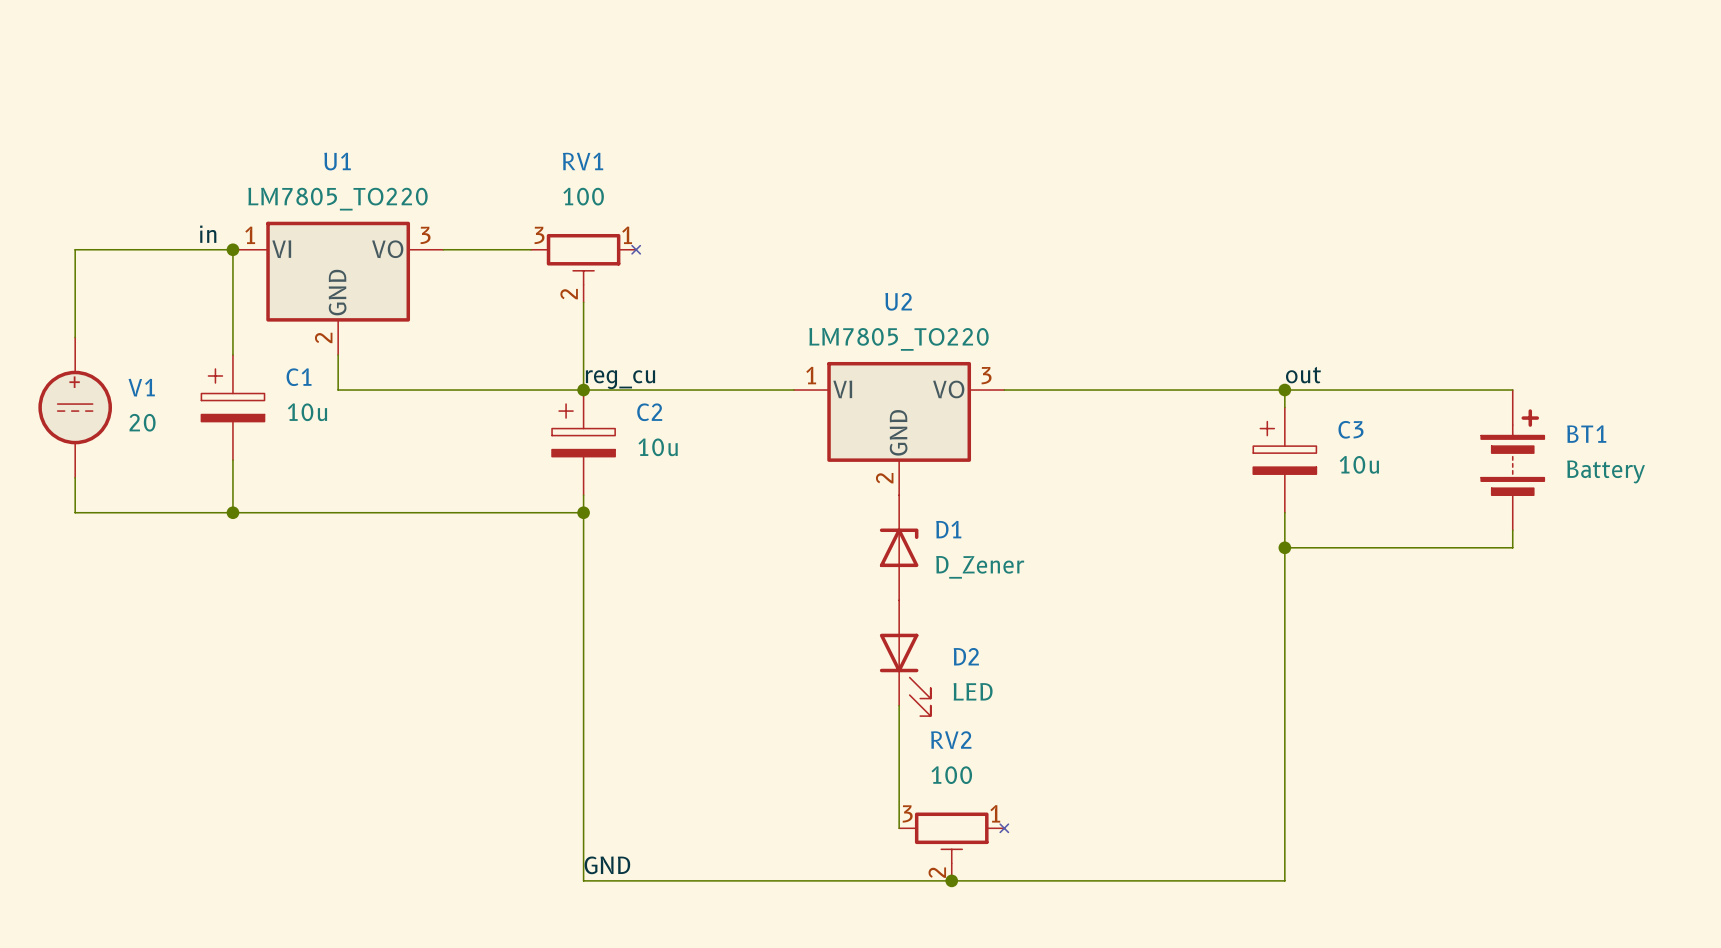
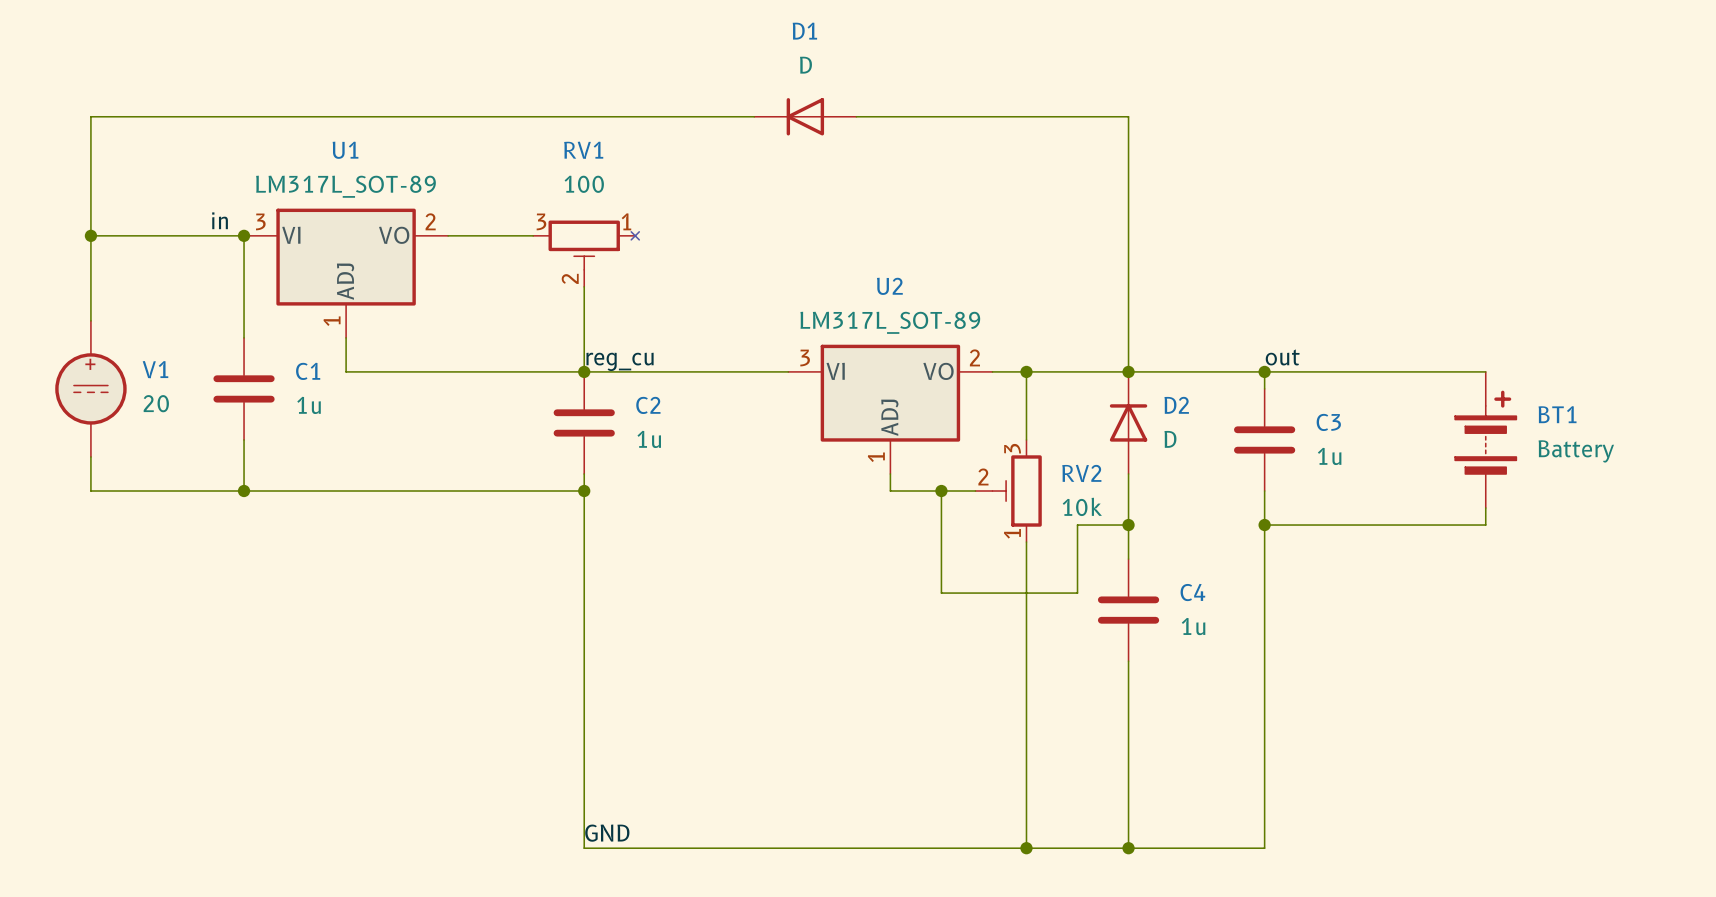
wire: none -> (754, 116) (90, 116) (90, 235)
wire: none -> (856, 116) (1128, 116) (1128, 371)
U1 value: LM7805_TO220 (337, 199) -> LM317L_SOT-89 (345, 186)
U1 pin number: 1 (250, 235) -> 3 (260, 221)
U1 pin number: 3 (425, 235) -> 2 (430, 221)
junction: none -> (90, 235)
U1 pin name: GND (337, 292) -> ADJ (345, 281)
U1 pin number: 2 (323, 337) -> 1 (332, 321)
U2 value: LM7805_TO220 (898, 339) -> LM317L_SOT-89 (890, 322)
C1 symbol: [201, 354, 265, 461] -> [213, 337, 275, 440]
U2 pin number: 1 (811, 375) -> 3 (805, 358)
U2 pin number: 3 (986, 375) -> 2 (974, 357)
C2 symbol: [552, 390, 616, 496] -> [553, 371, 615, 474]
wire: none -> (1026, 371) (1026, 439)
junction: none -> (1026, 371)
junction: none -> (1128, 371)
C3 symbol: [1253, 407, 1317, 513] -> [1234, 388, 1296, 492]
C1 value: 10u (307, 412) -> 1u (309, 405)
U2 pin name: GND (898, 432) -> ADJ (889, 417)
C2 value: 10u (658, 447) -> 1u (649, 439)
C3 value: 10u (1359, 464) -> 1u (1329, 456)
U2 pin number: 2 (884, 478) -> 1 (876, 457)
D1 symbol: [879, 495, 919, 601] -> [754, 98, 857, 136]
wire: none -> (890, 473) (890, 491) (975, 491)
wire: none -> (1128, 473) (1128, 559)
wire: none -> (941, 491) (941, 593) (1077, 593) (1077, 525) (1128, 525)
junction: none -> (941, 491)
D1 name position: D1 (948, 529) -> D1 (804, 31)
junction: none -> (1128, 525)
wire: none -> (1026, 542) (1026, 848)
D1 value: D_Zener (980, 567) -> D (805, 65)
D2 symbol: [879, 600, 931, 717] -> [1109, 371, 1148, 474]
C4: none -> 1u (1128, 610)
wire: none -> (1128, 661) (1128, 848)
D2 value: LED (973, 691) -> D (1170, 439)
wire: (899, 705) (899, 828) -> none
RV2 name position: RV2 (951, 740) -> RV2 (1081, 473)
RV2 value: 100 (951, 775) -> 10k (1082, 506)
RV2 symbol: [899, 812, 1009, 881] -> [975, 439, 1042, 543]
junction: (951, 880) -> none
junction: none -> (1026, 848)
junction: none -> (1128, 848)

